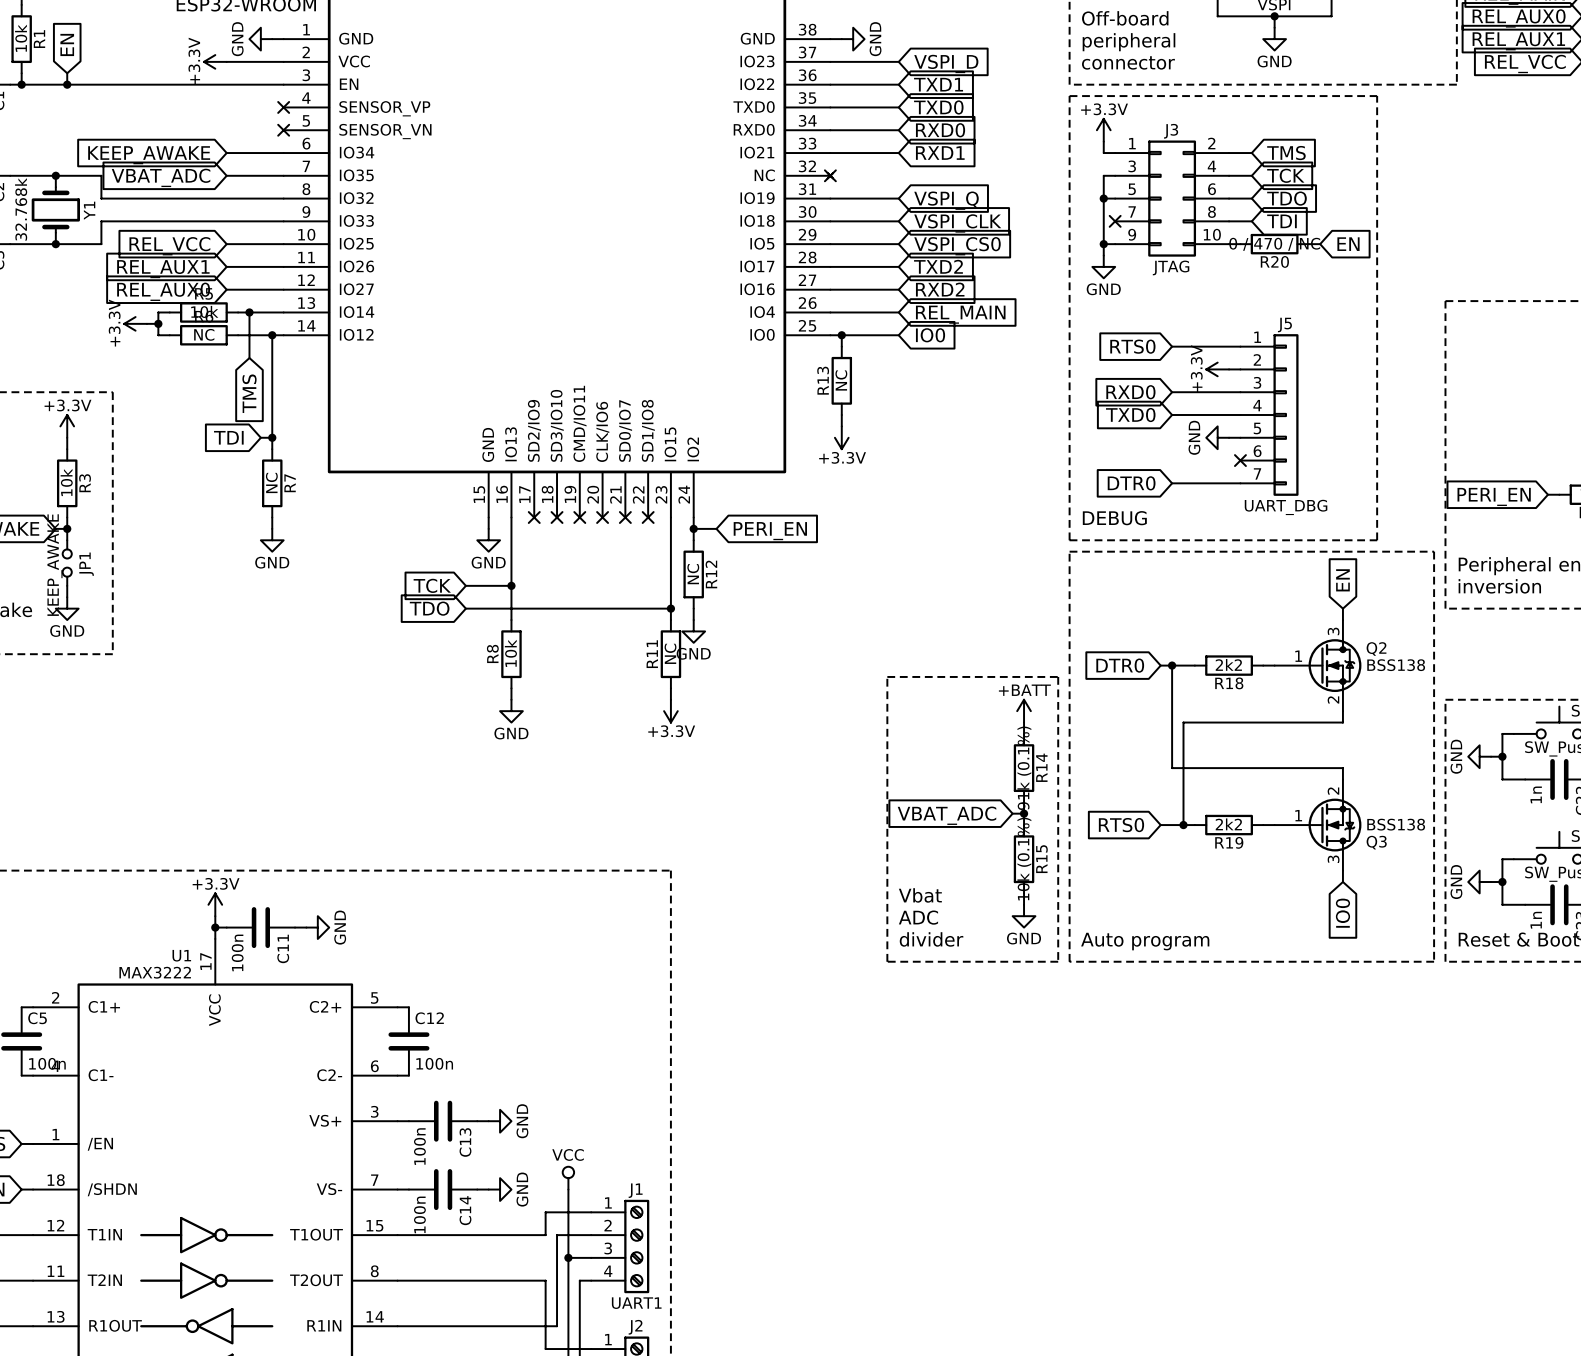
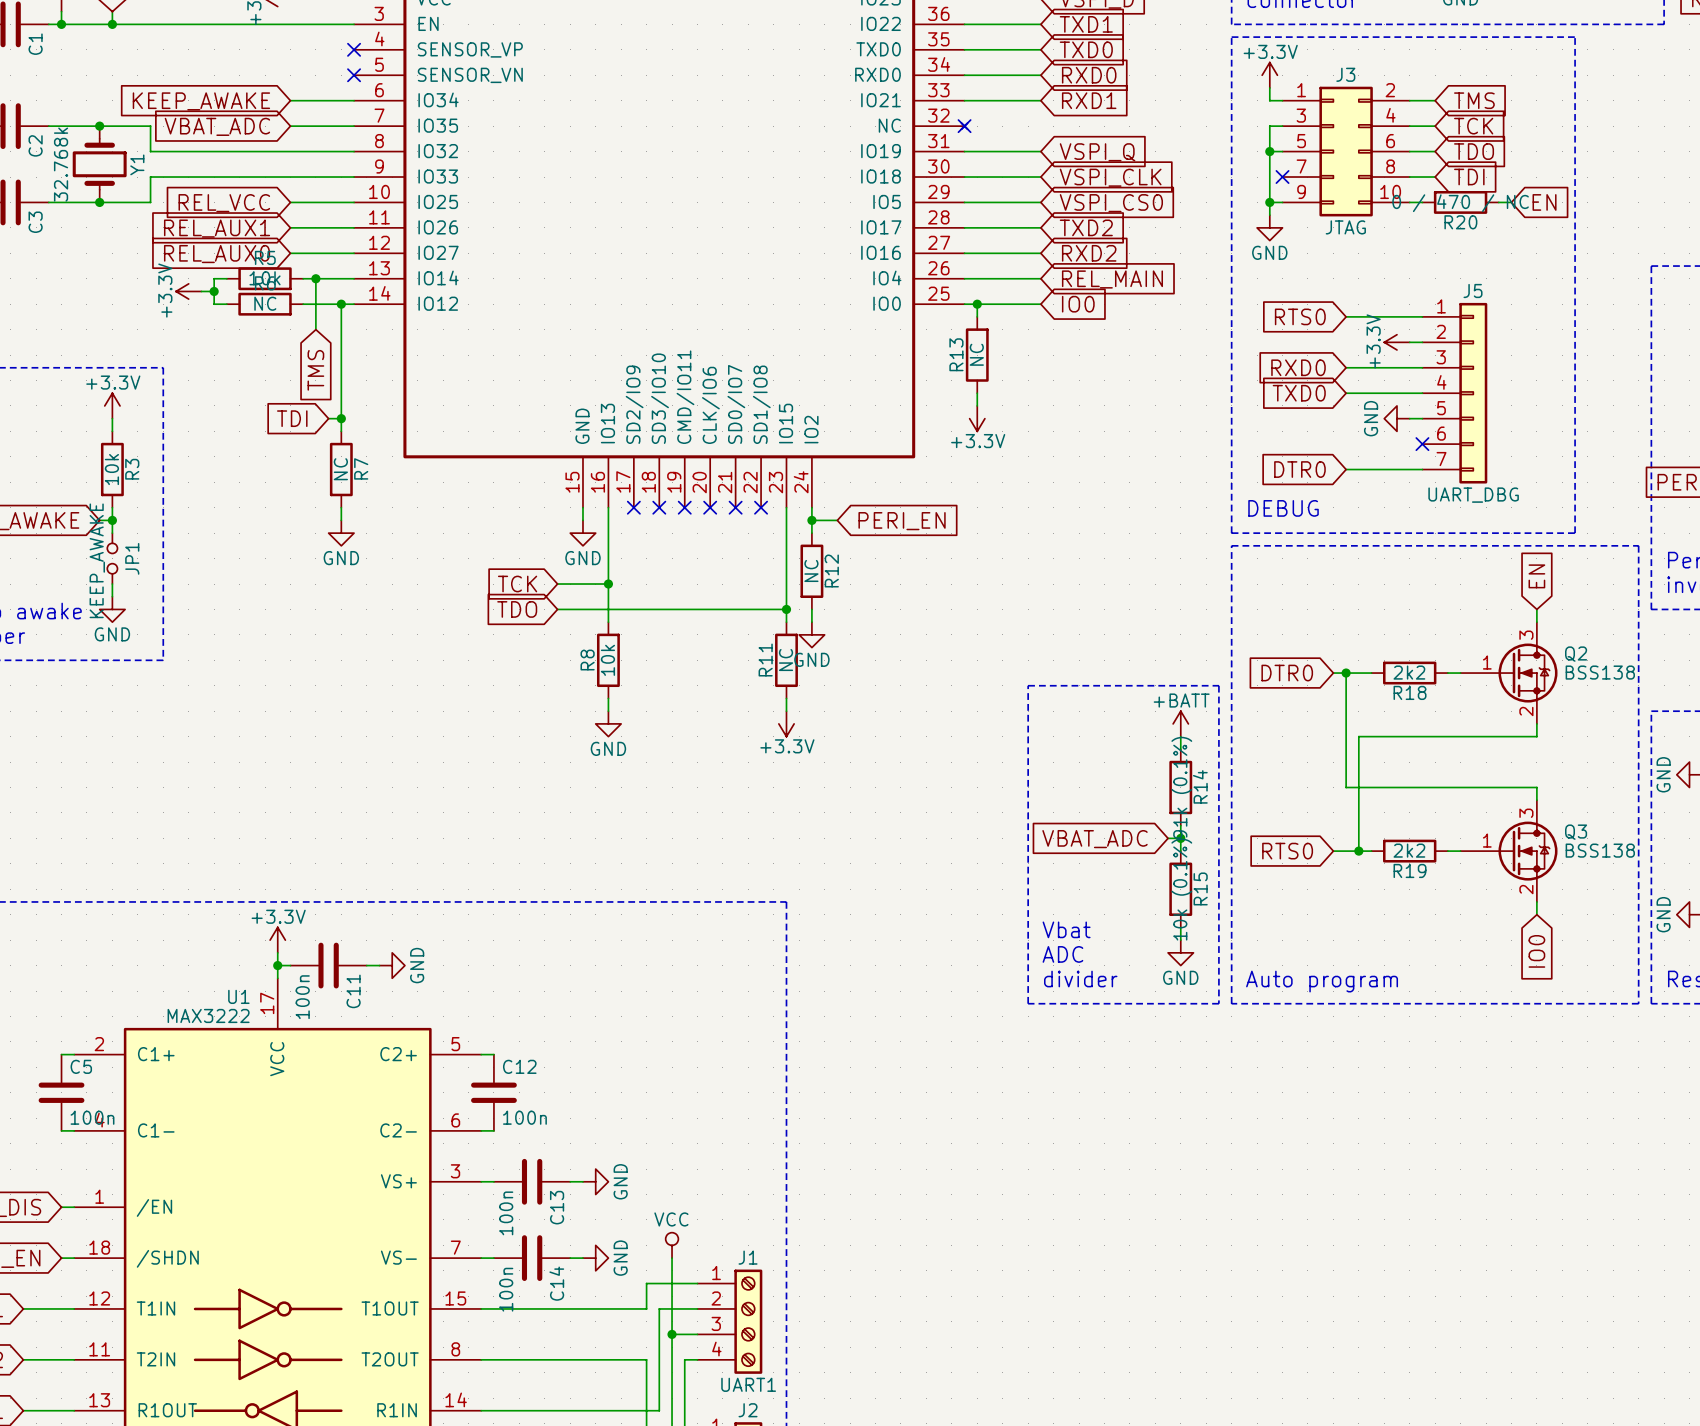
Q3 flip: as is (1334, 825) -> up-down (1527, 851)

